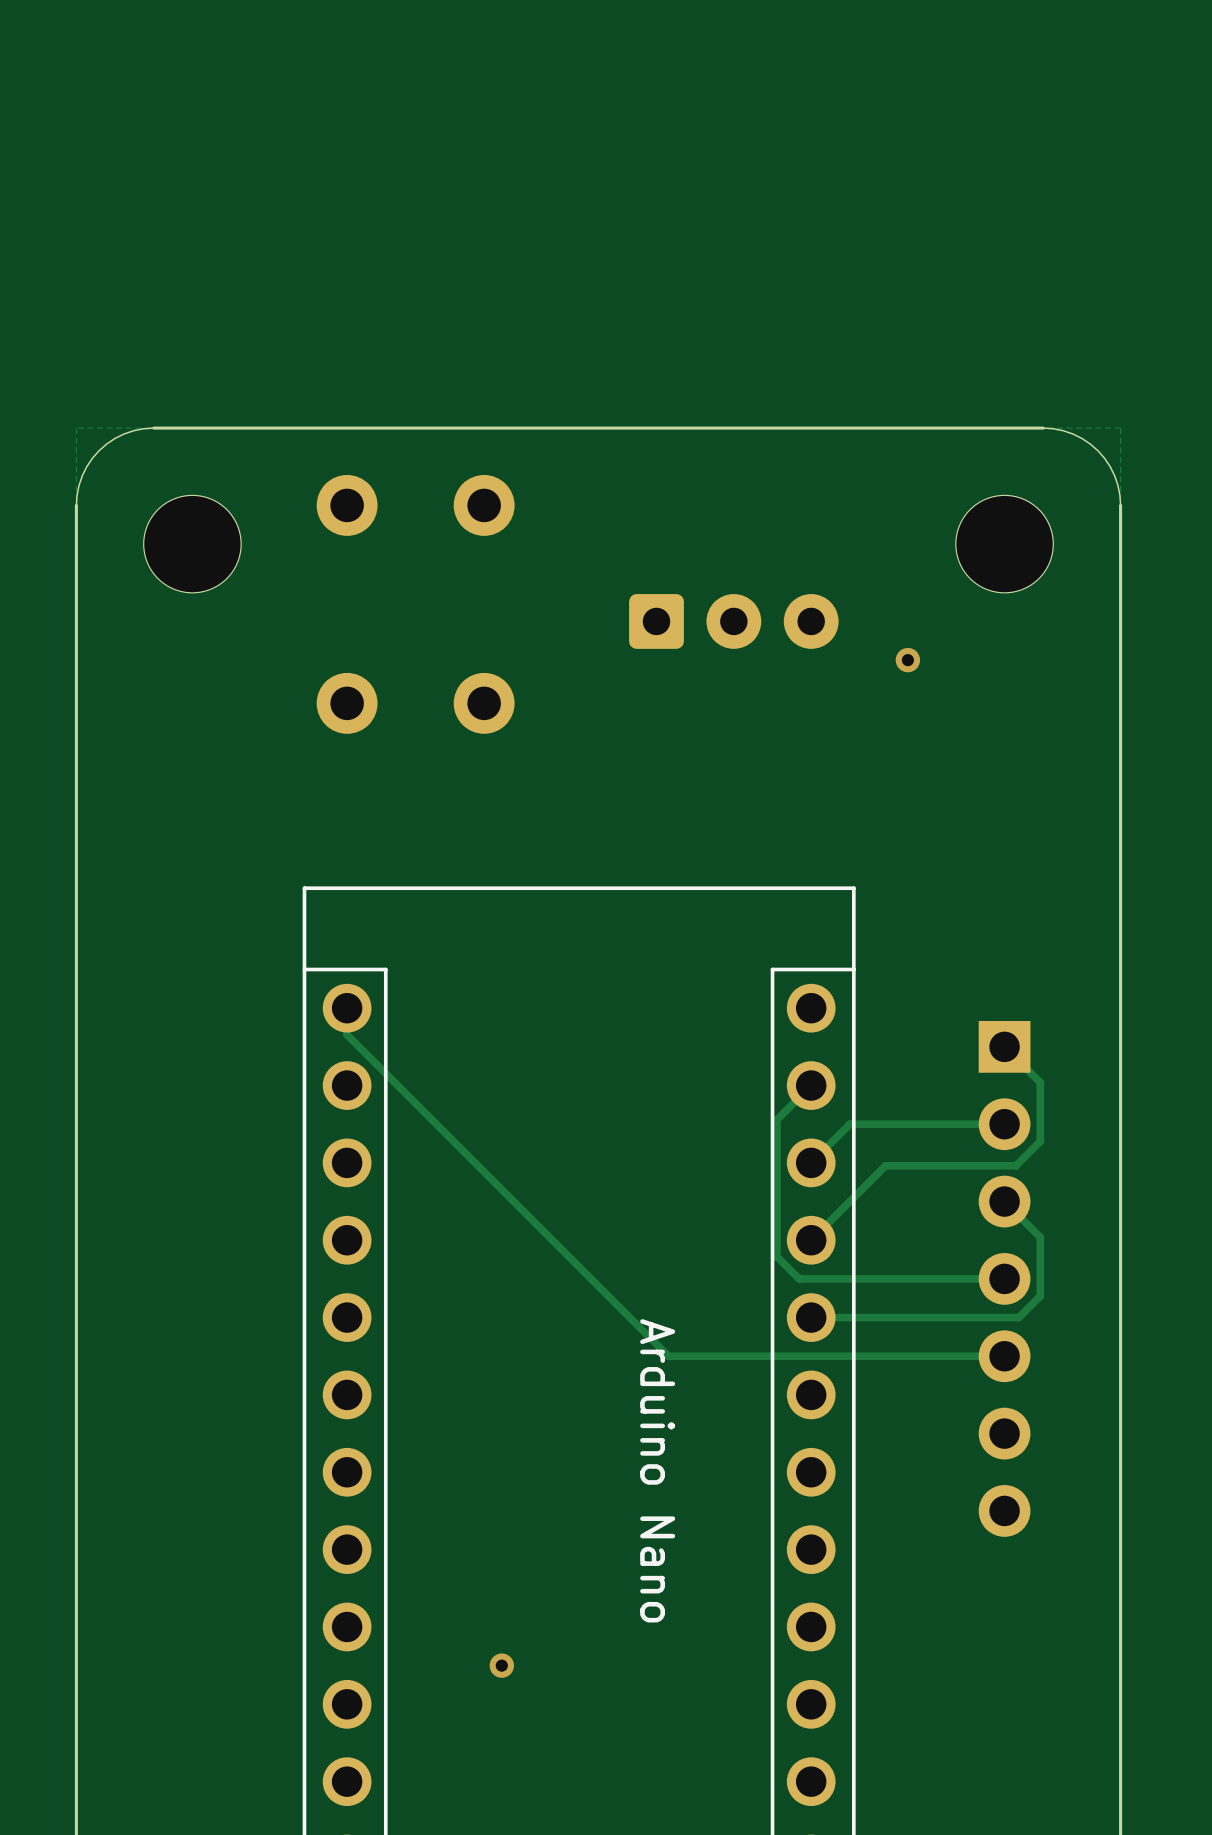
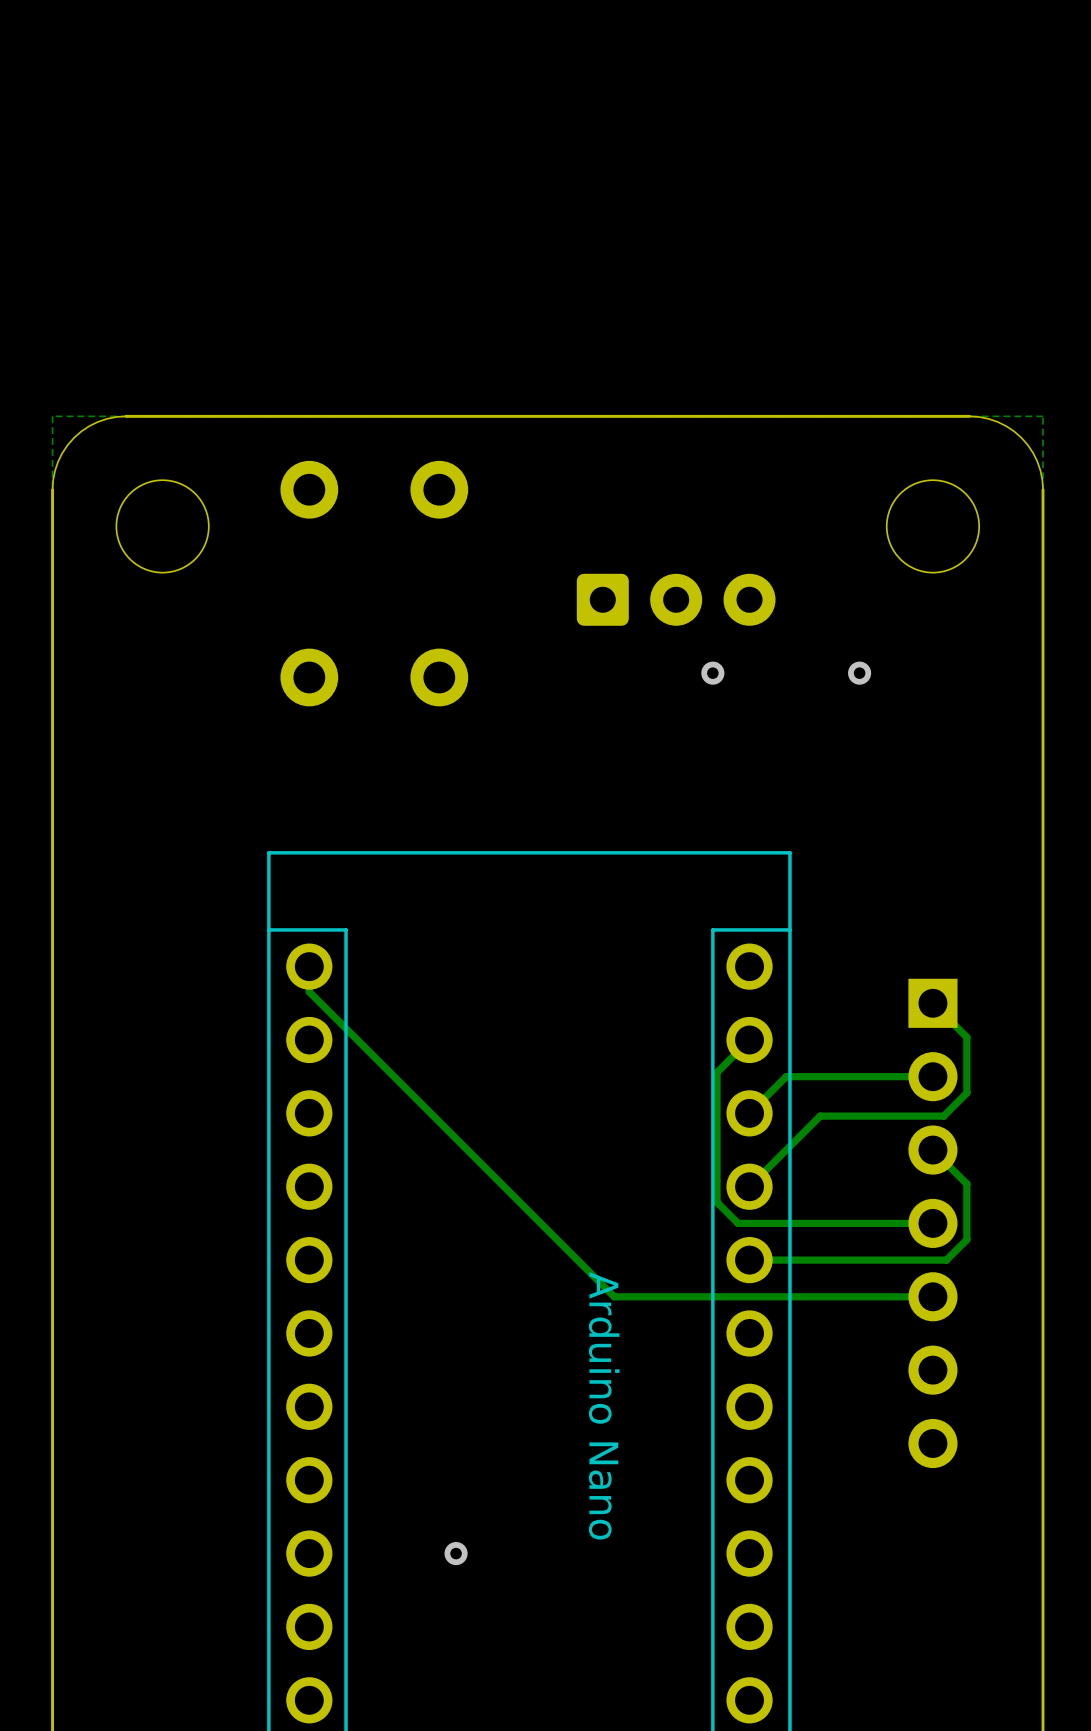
via position: (907, 660) -> (859, 673)
via: none -> (712, 673)
via position: (501, 1665) -> (456, 1553)

